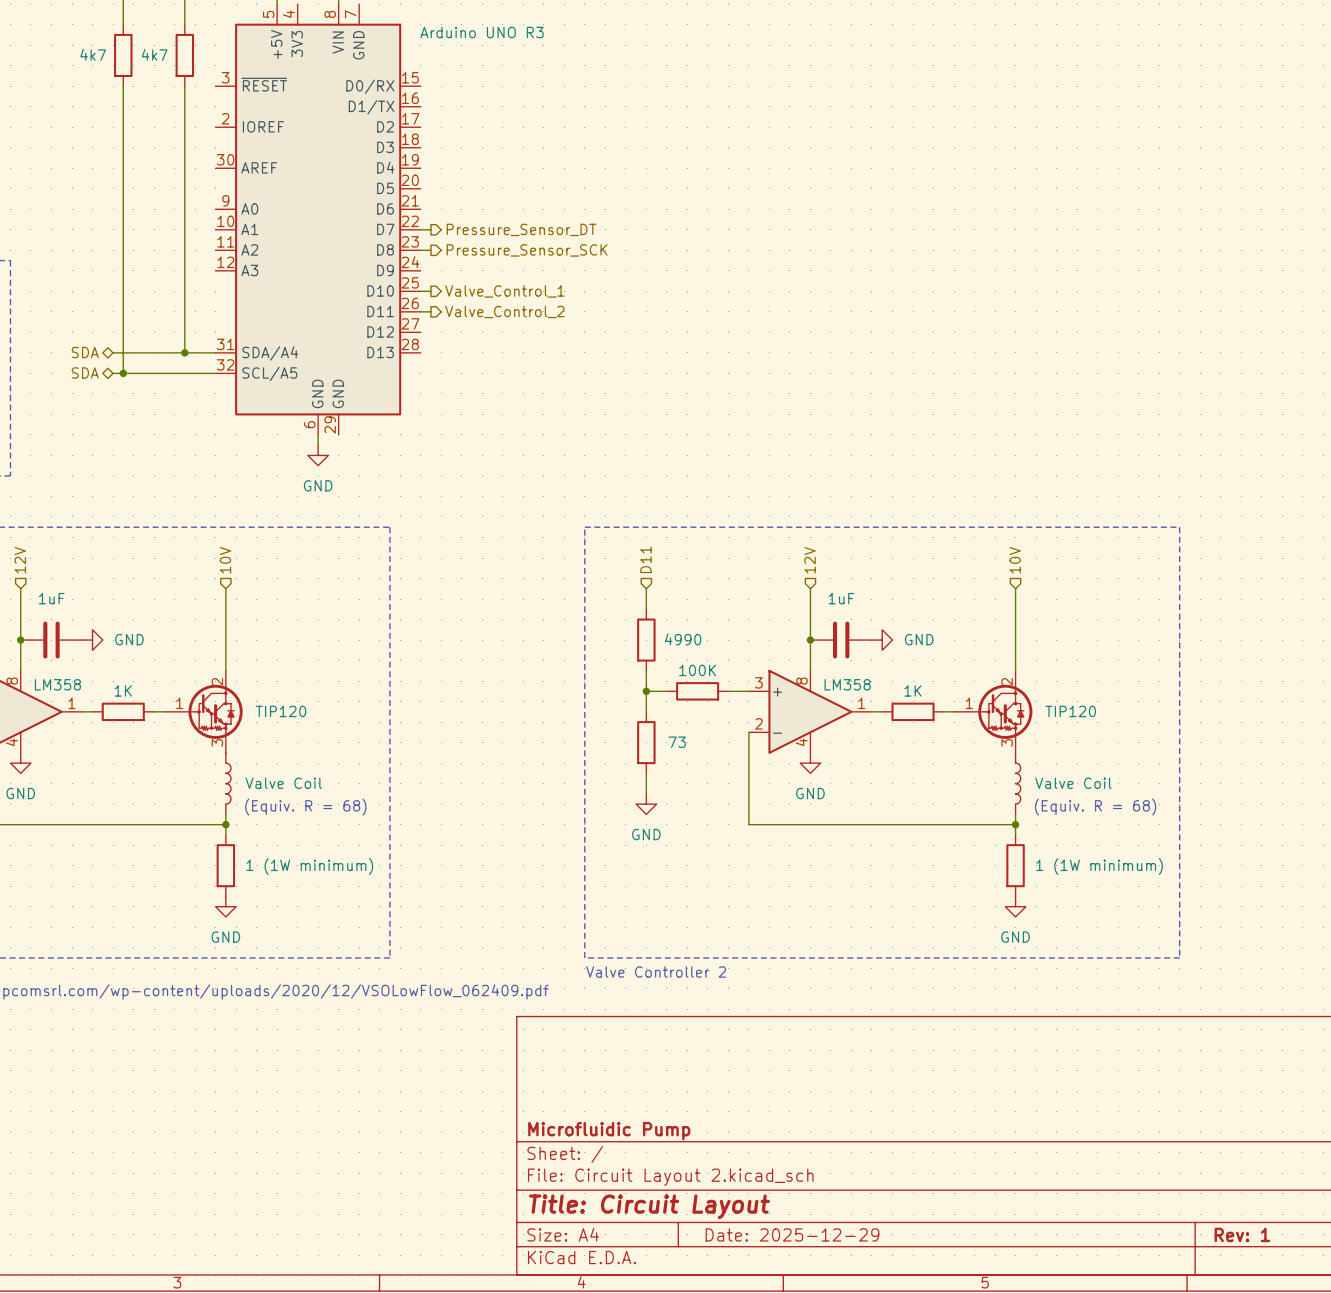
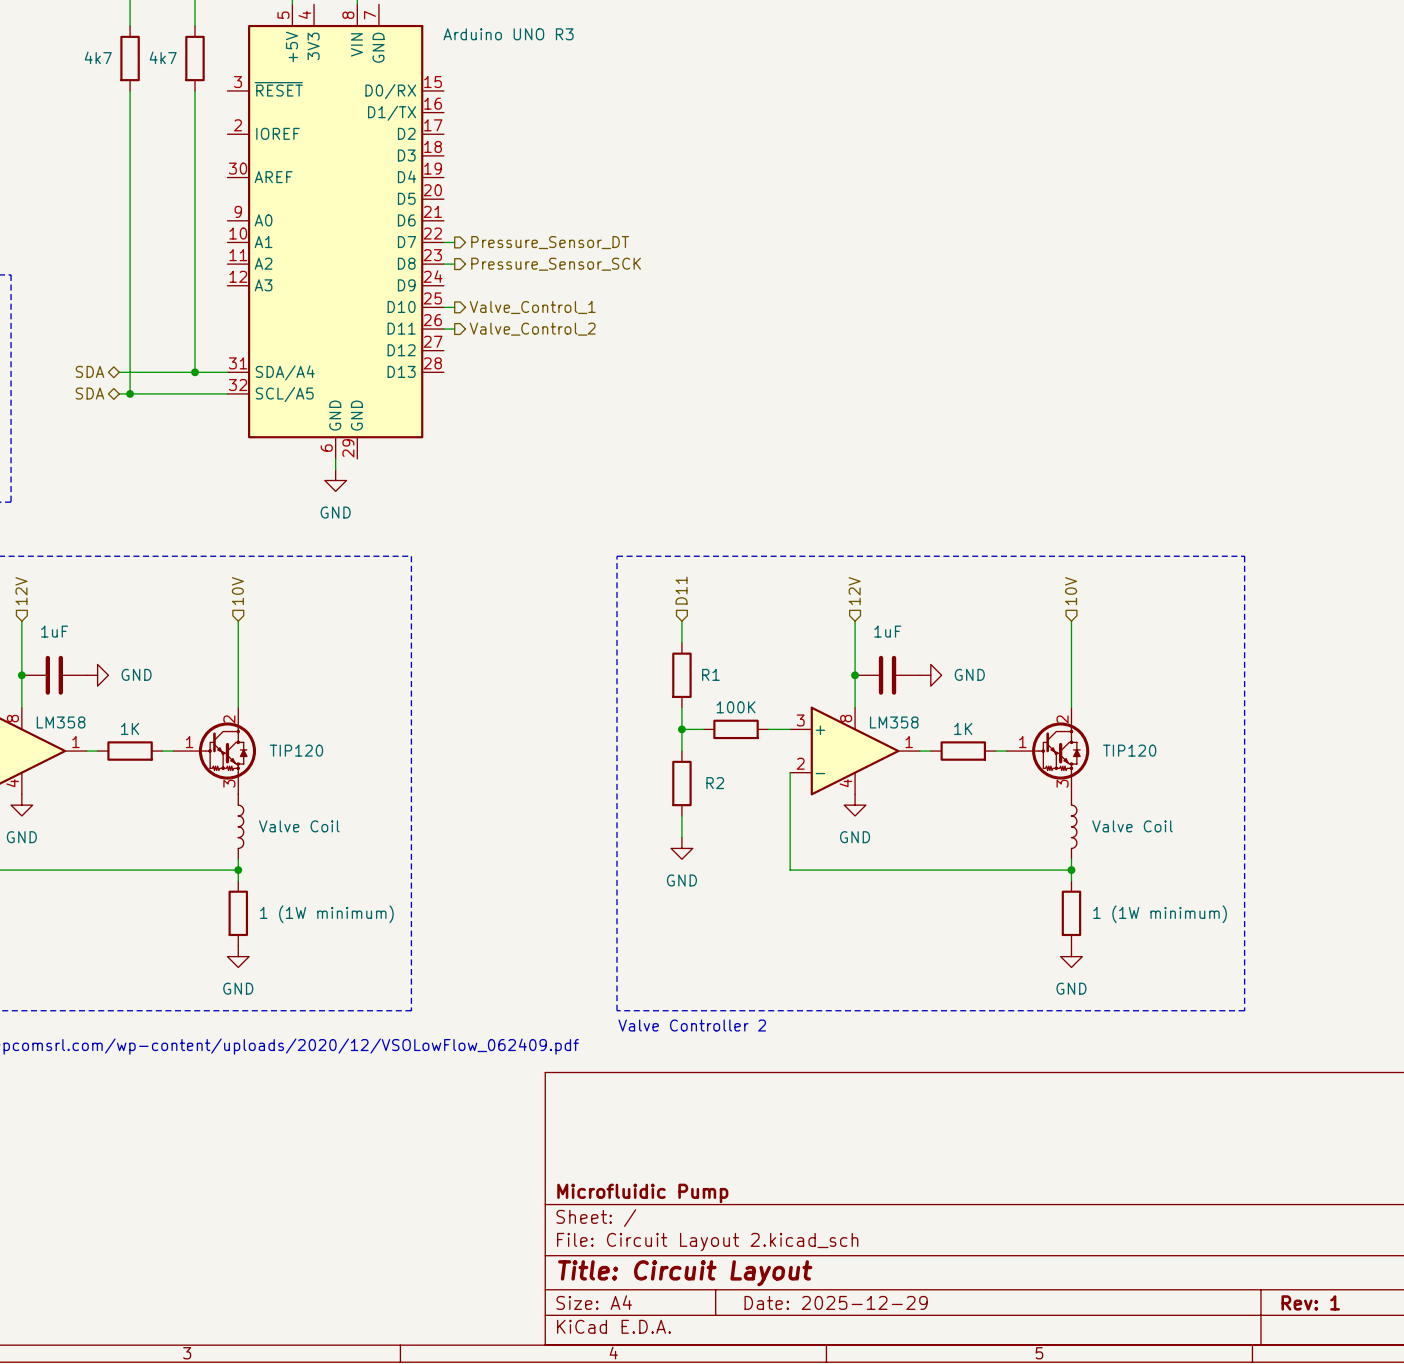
part value: 4990 (683, 639) -> R1 (710, 674)
part value: 73 (677, 742) -> R2 (715, 783)
text: (Equiv. R = 68) (305, 807) -> none
text: (Equiv. R = 68) (1095, 807) -> none

